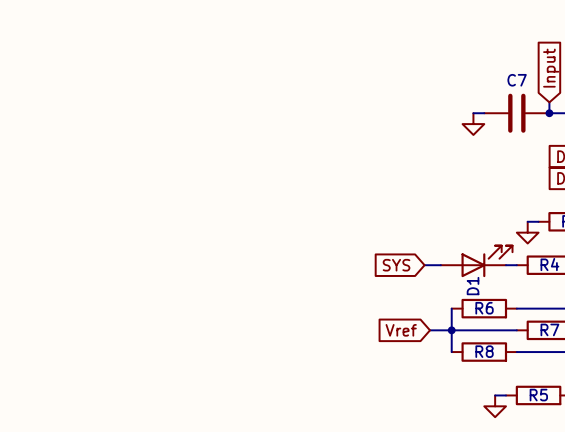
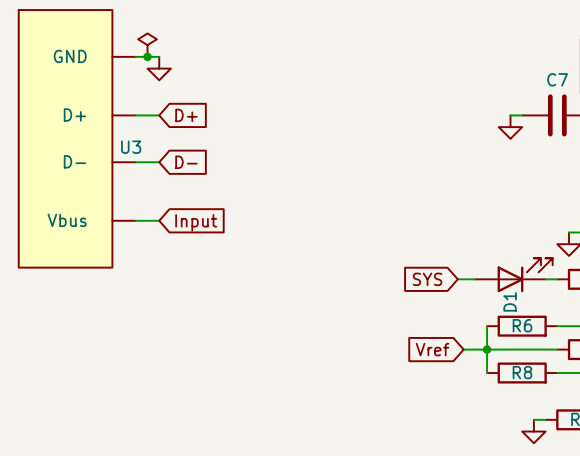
power symbol: none -> (147, 45)
wire: none -> (135, 56) (159, 56)
junction: none -> (147, 56)
power symbol: none -> (159, 68)
wire: none -> (135, 115) (159, 115)
global label: none -> D+ (186, 115)
U3: none -> (77, 138)
wire: none -> (135, 162) (159, 162)
global label: none -> D- (186, 162)
wire: none -> (135, 220) (159, 220)
global label: none -> Input (196, 222)

